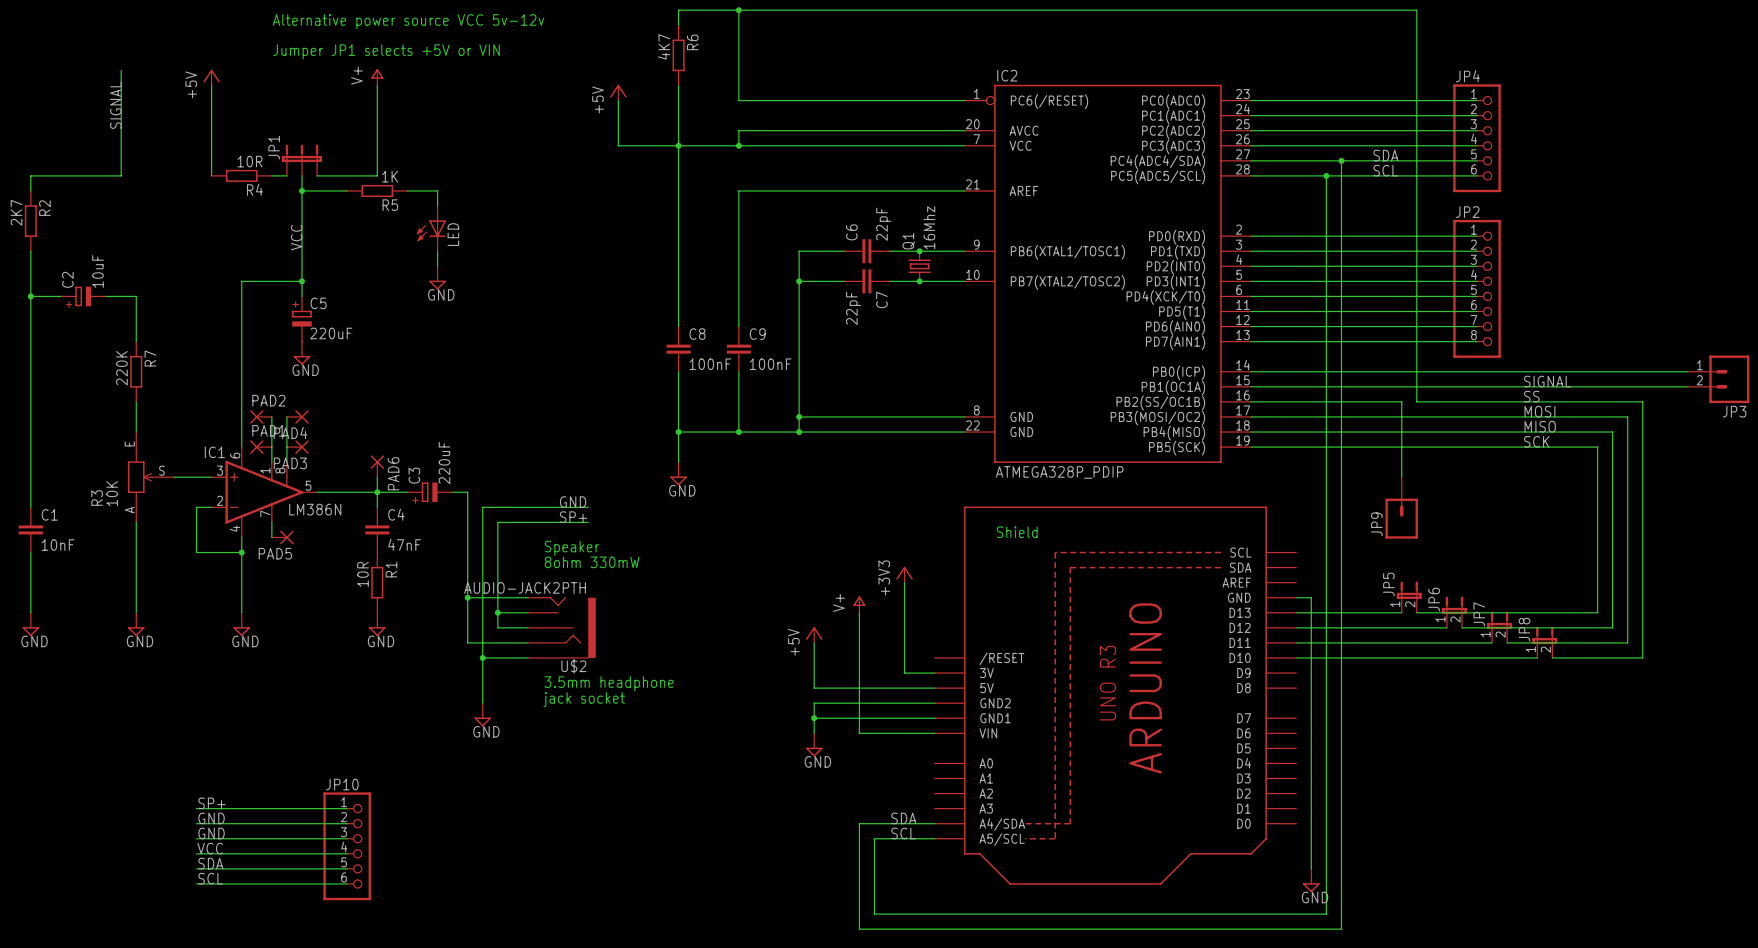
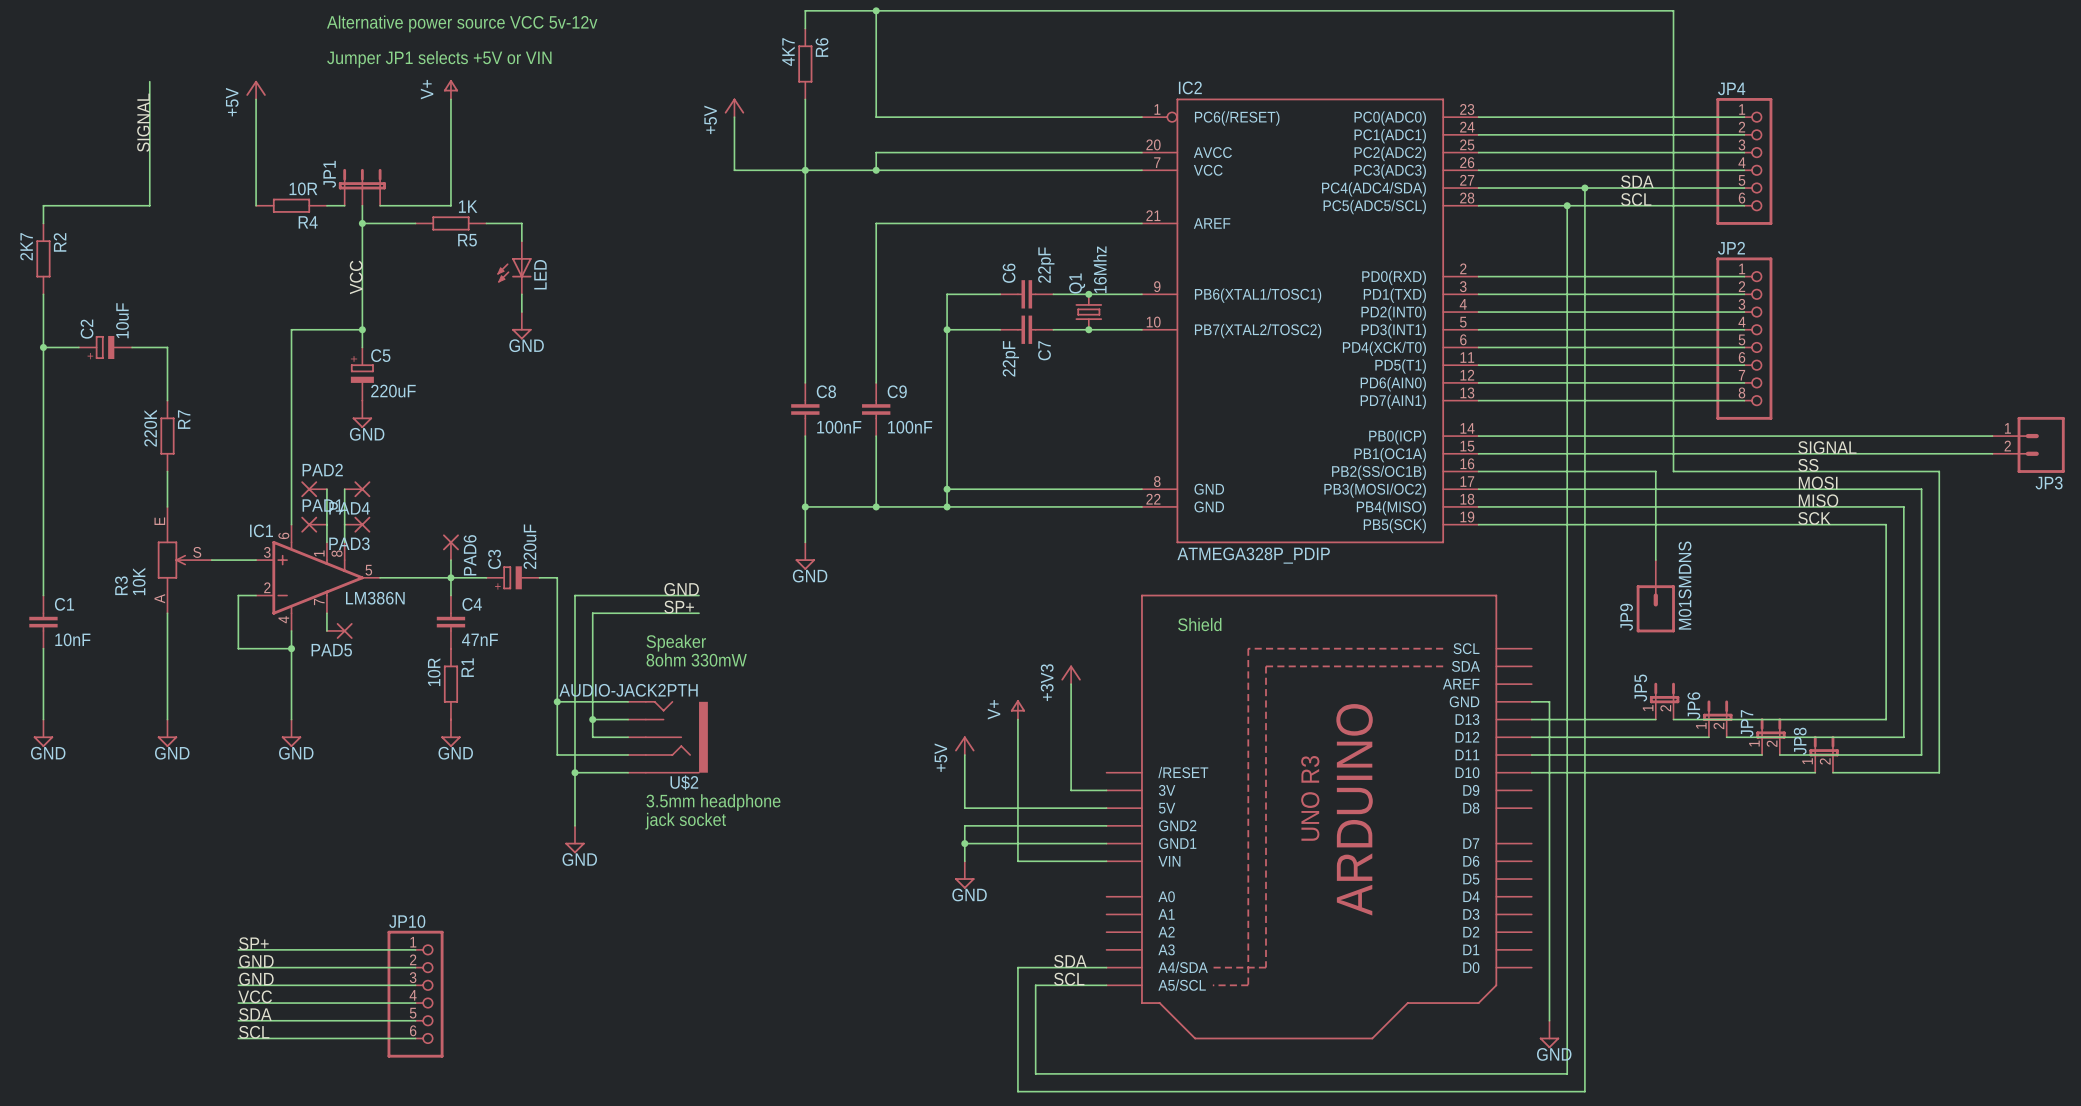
JP9 value: none -> M01SMDNS (1685, 585)

